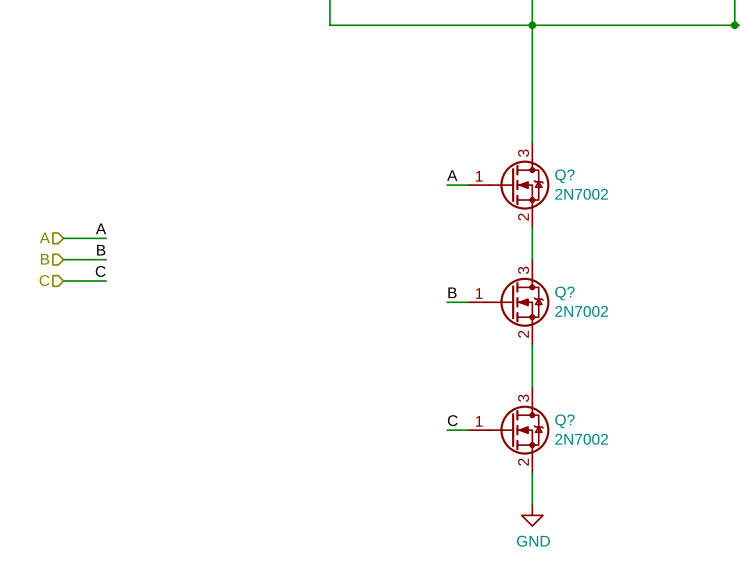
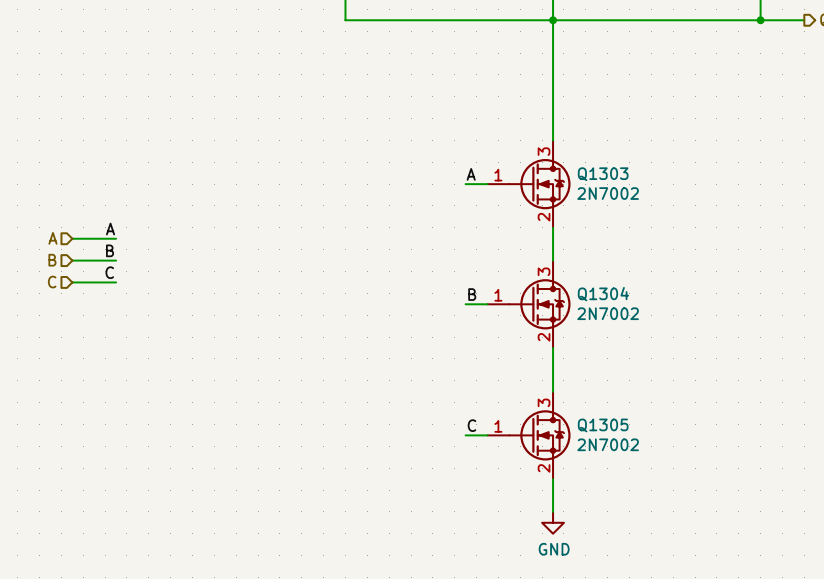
Q? name: Q? (564, 176) -> Q1303 (603, 174)
Q? name: Q? (564, 293) -> Q1304 (603, 294)
Q? name: Q? (564, 421) -> Q1305 (603, 425)

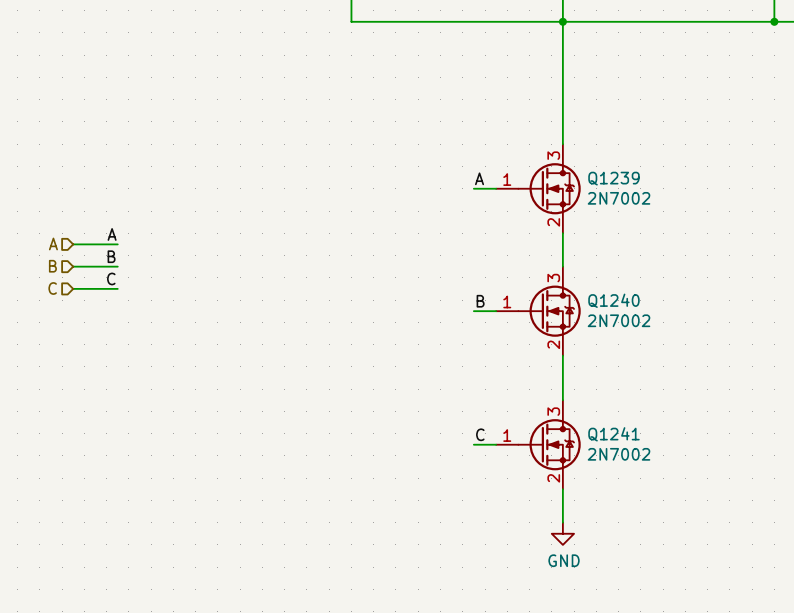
Q1303 name: Q1303 (603, 174) -> Q1239 (613, 178)
Q1304 name: Q1304 (603, 294) -> Q1240 (613, 300)
Q1305 name: Q1305 (603, 425) -> Q1241 (613, 434)

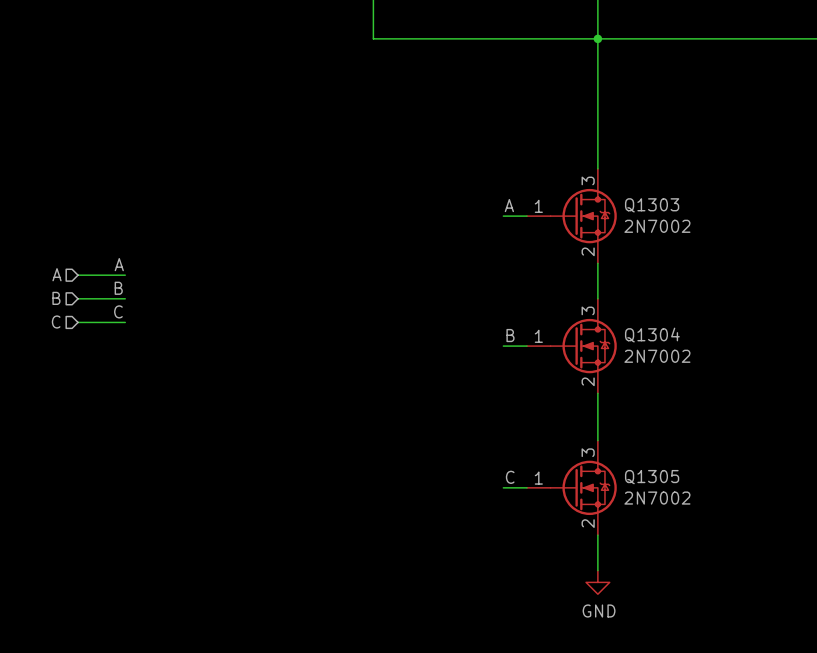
Q1239 name: Q1239 (613, 178) -> Q1303 (652, 205)
Q1240 name: Q1240 (613, 300) -> Q1304 (652, 335)
Q1241 name: Q1241 (613, 434) -> Q1305 (652, 477)

